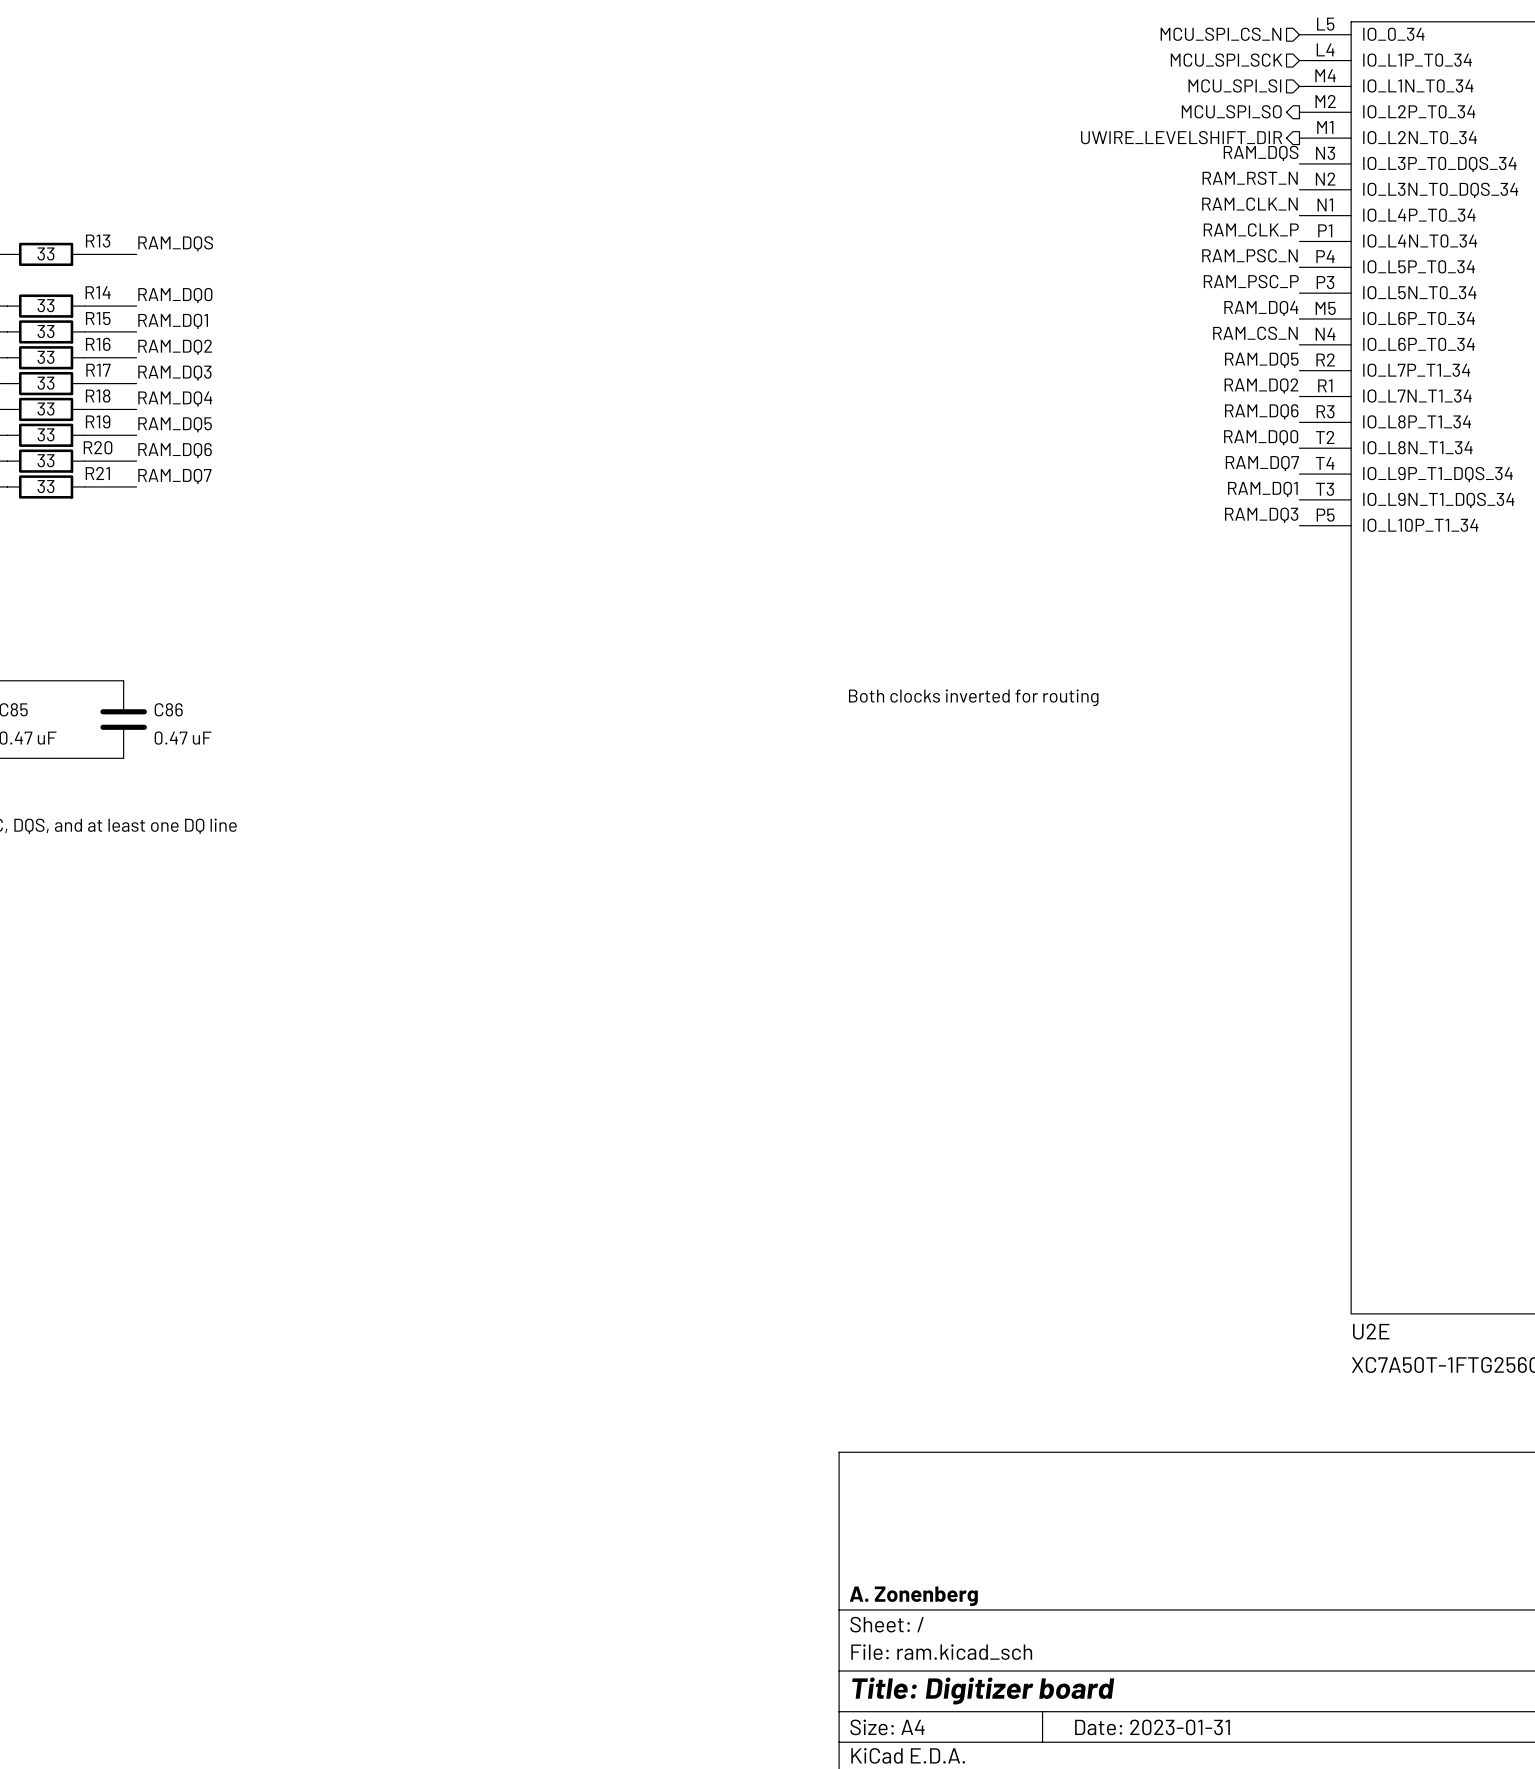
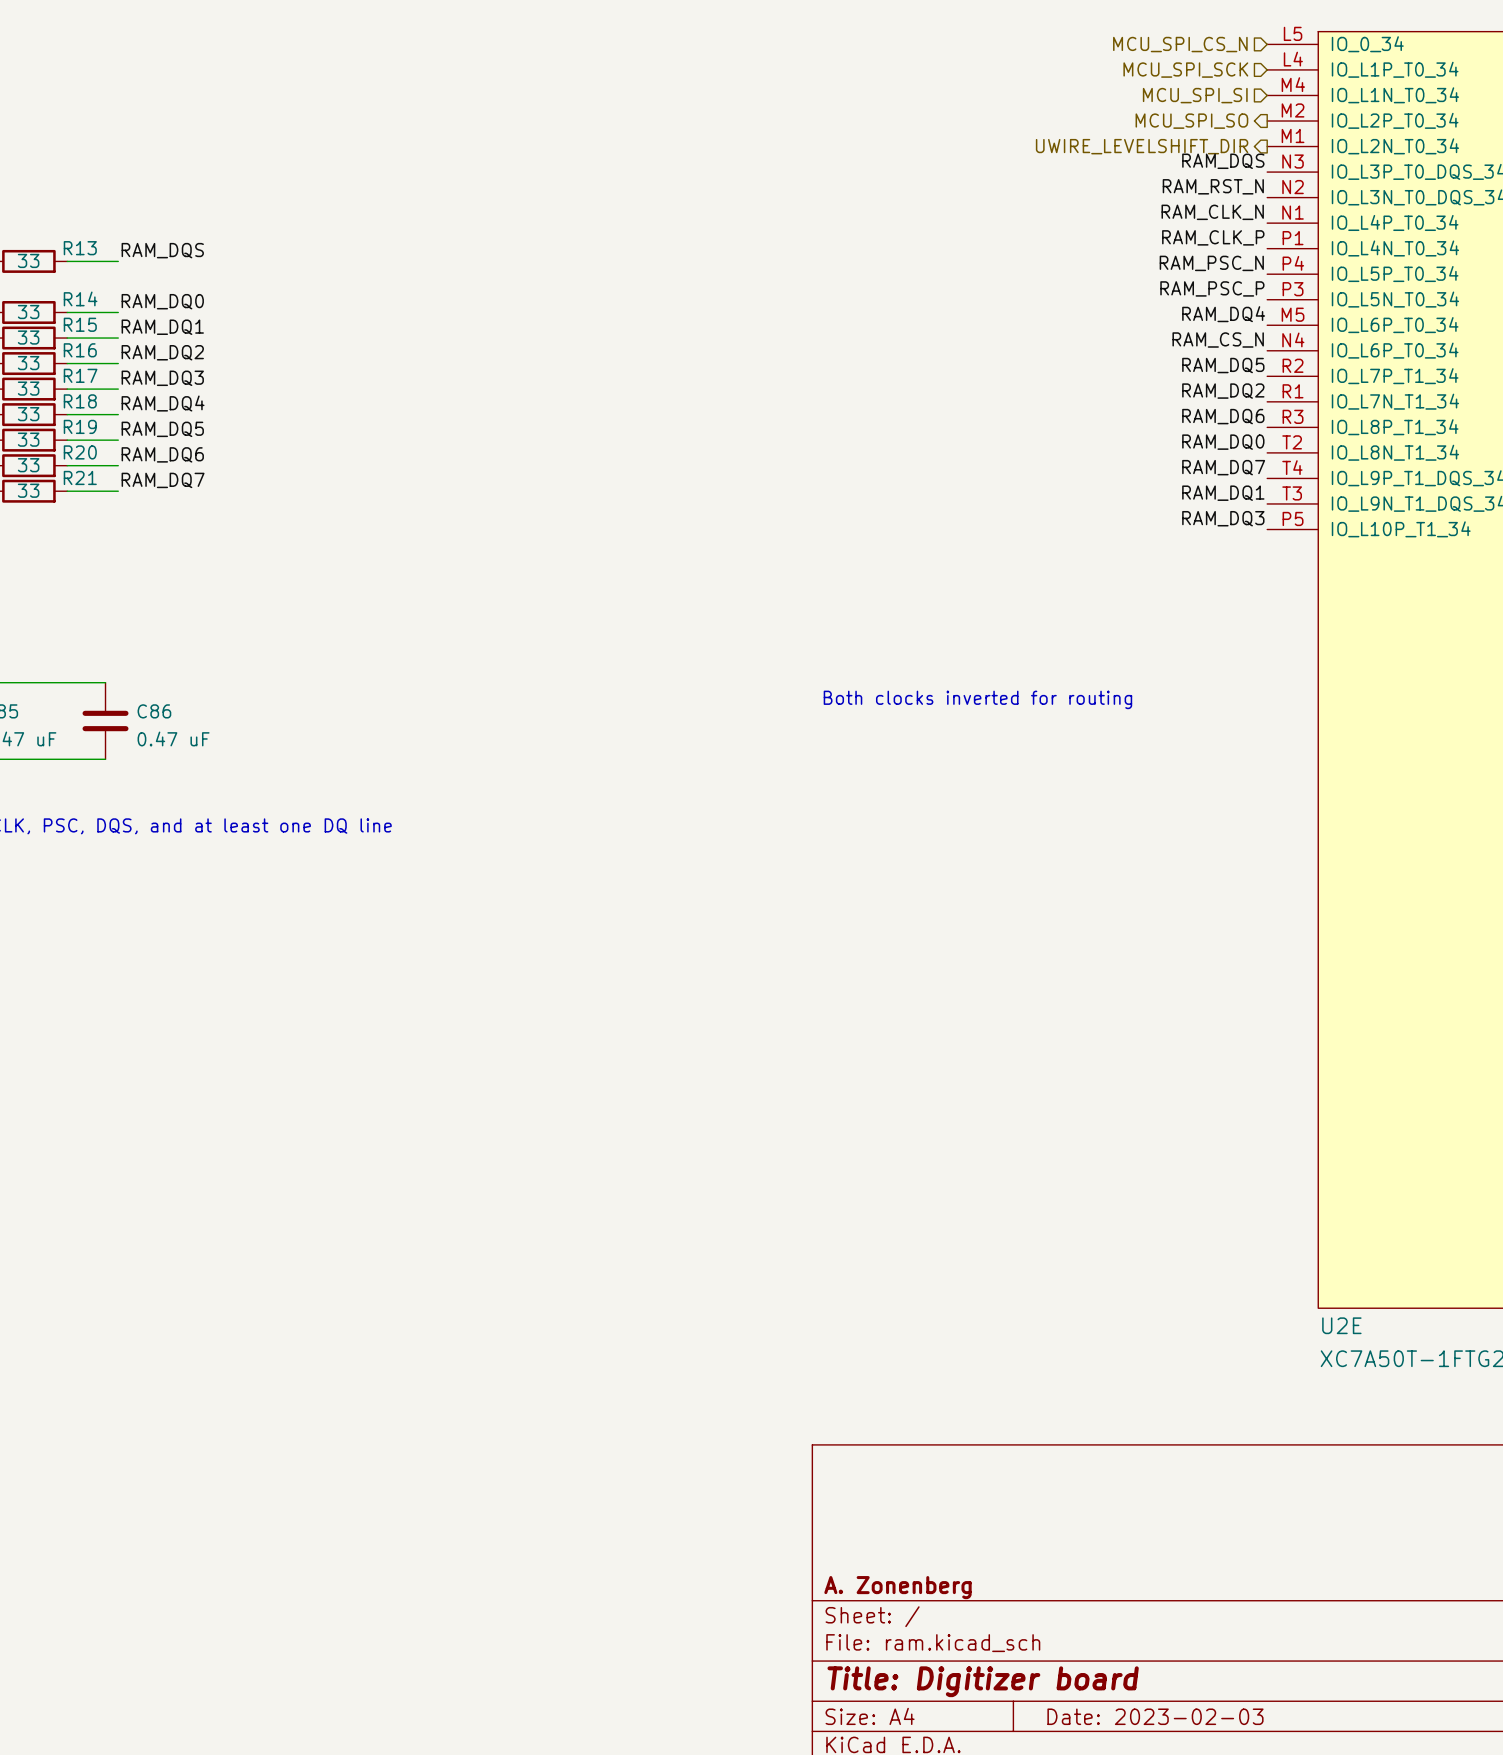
title block: Date: 2023-01-31 (1152, 1727) -> Date: 2023-02-03 (1155, 1716)

